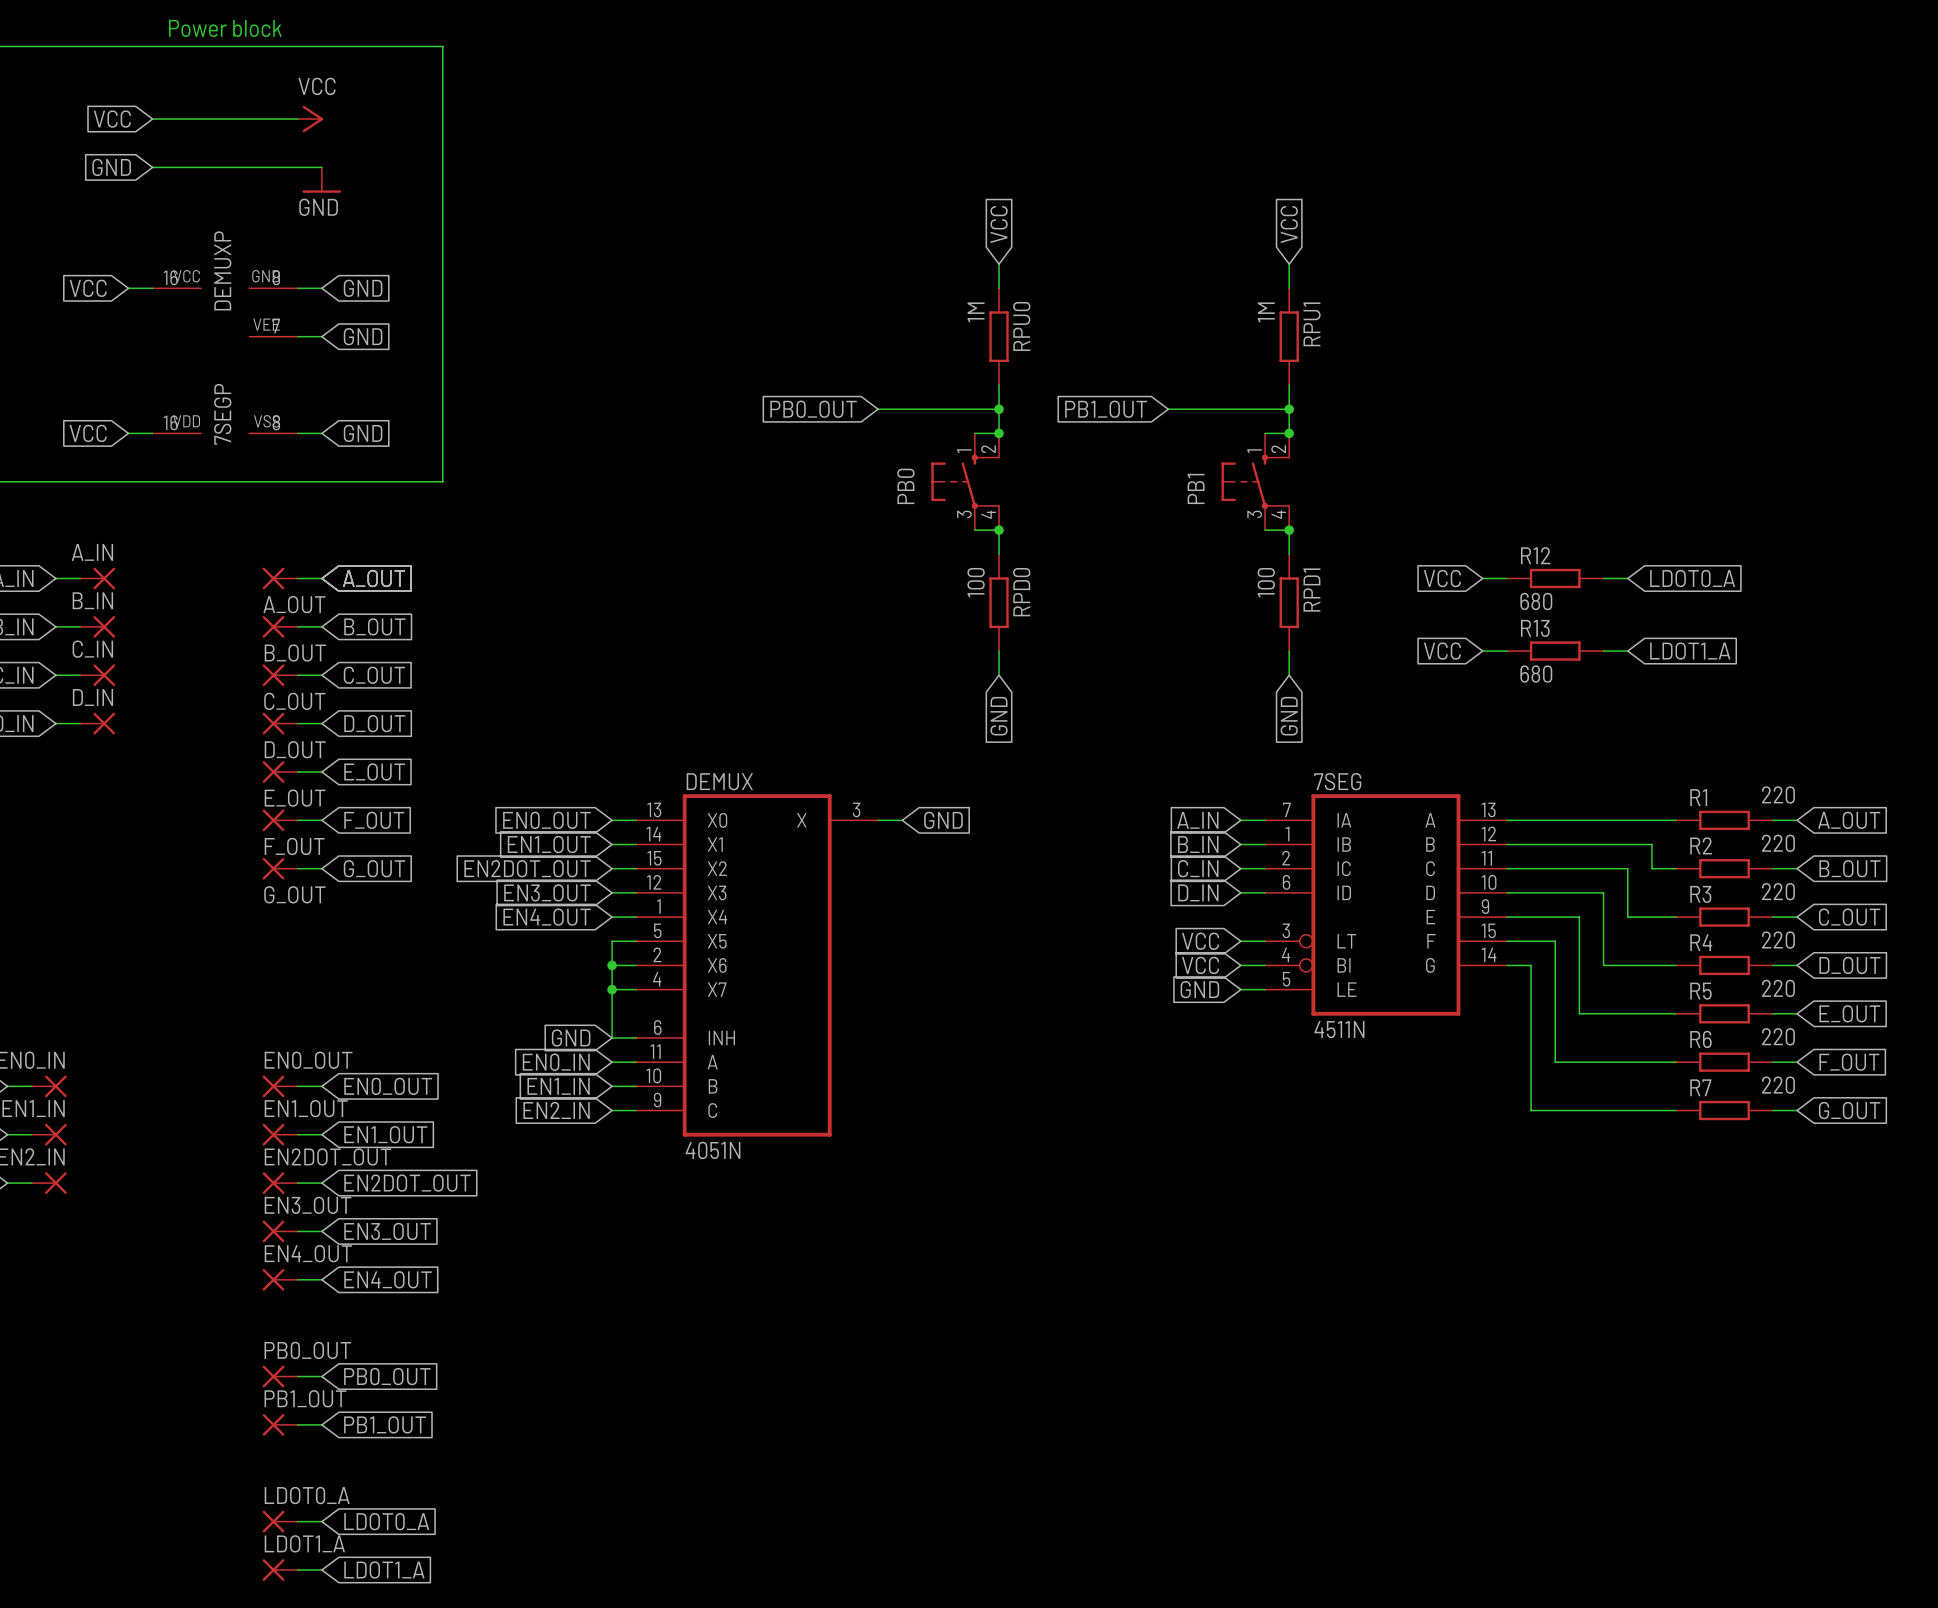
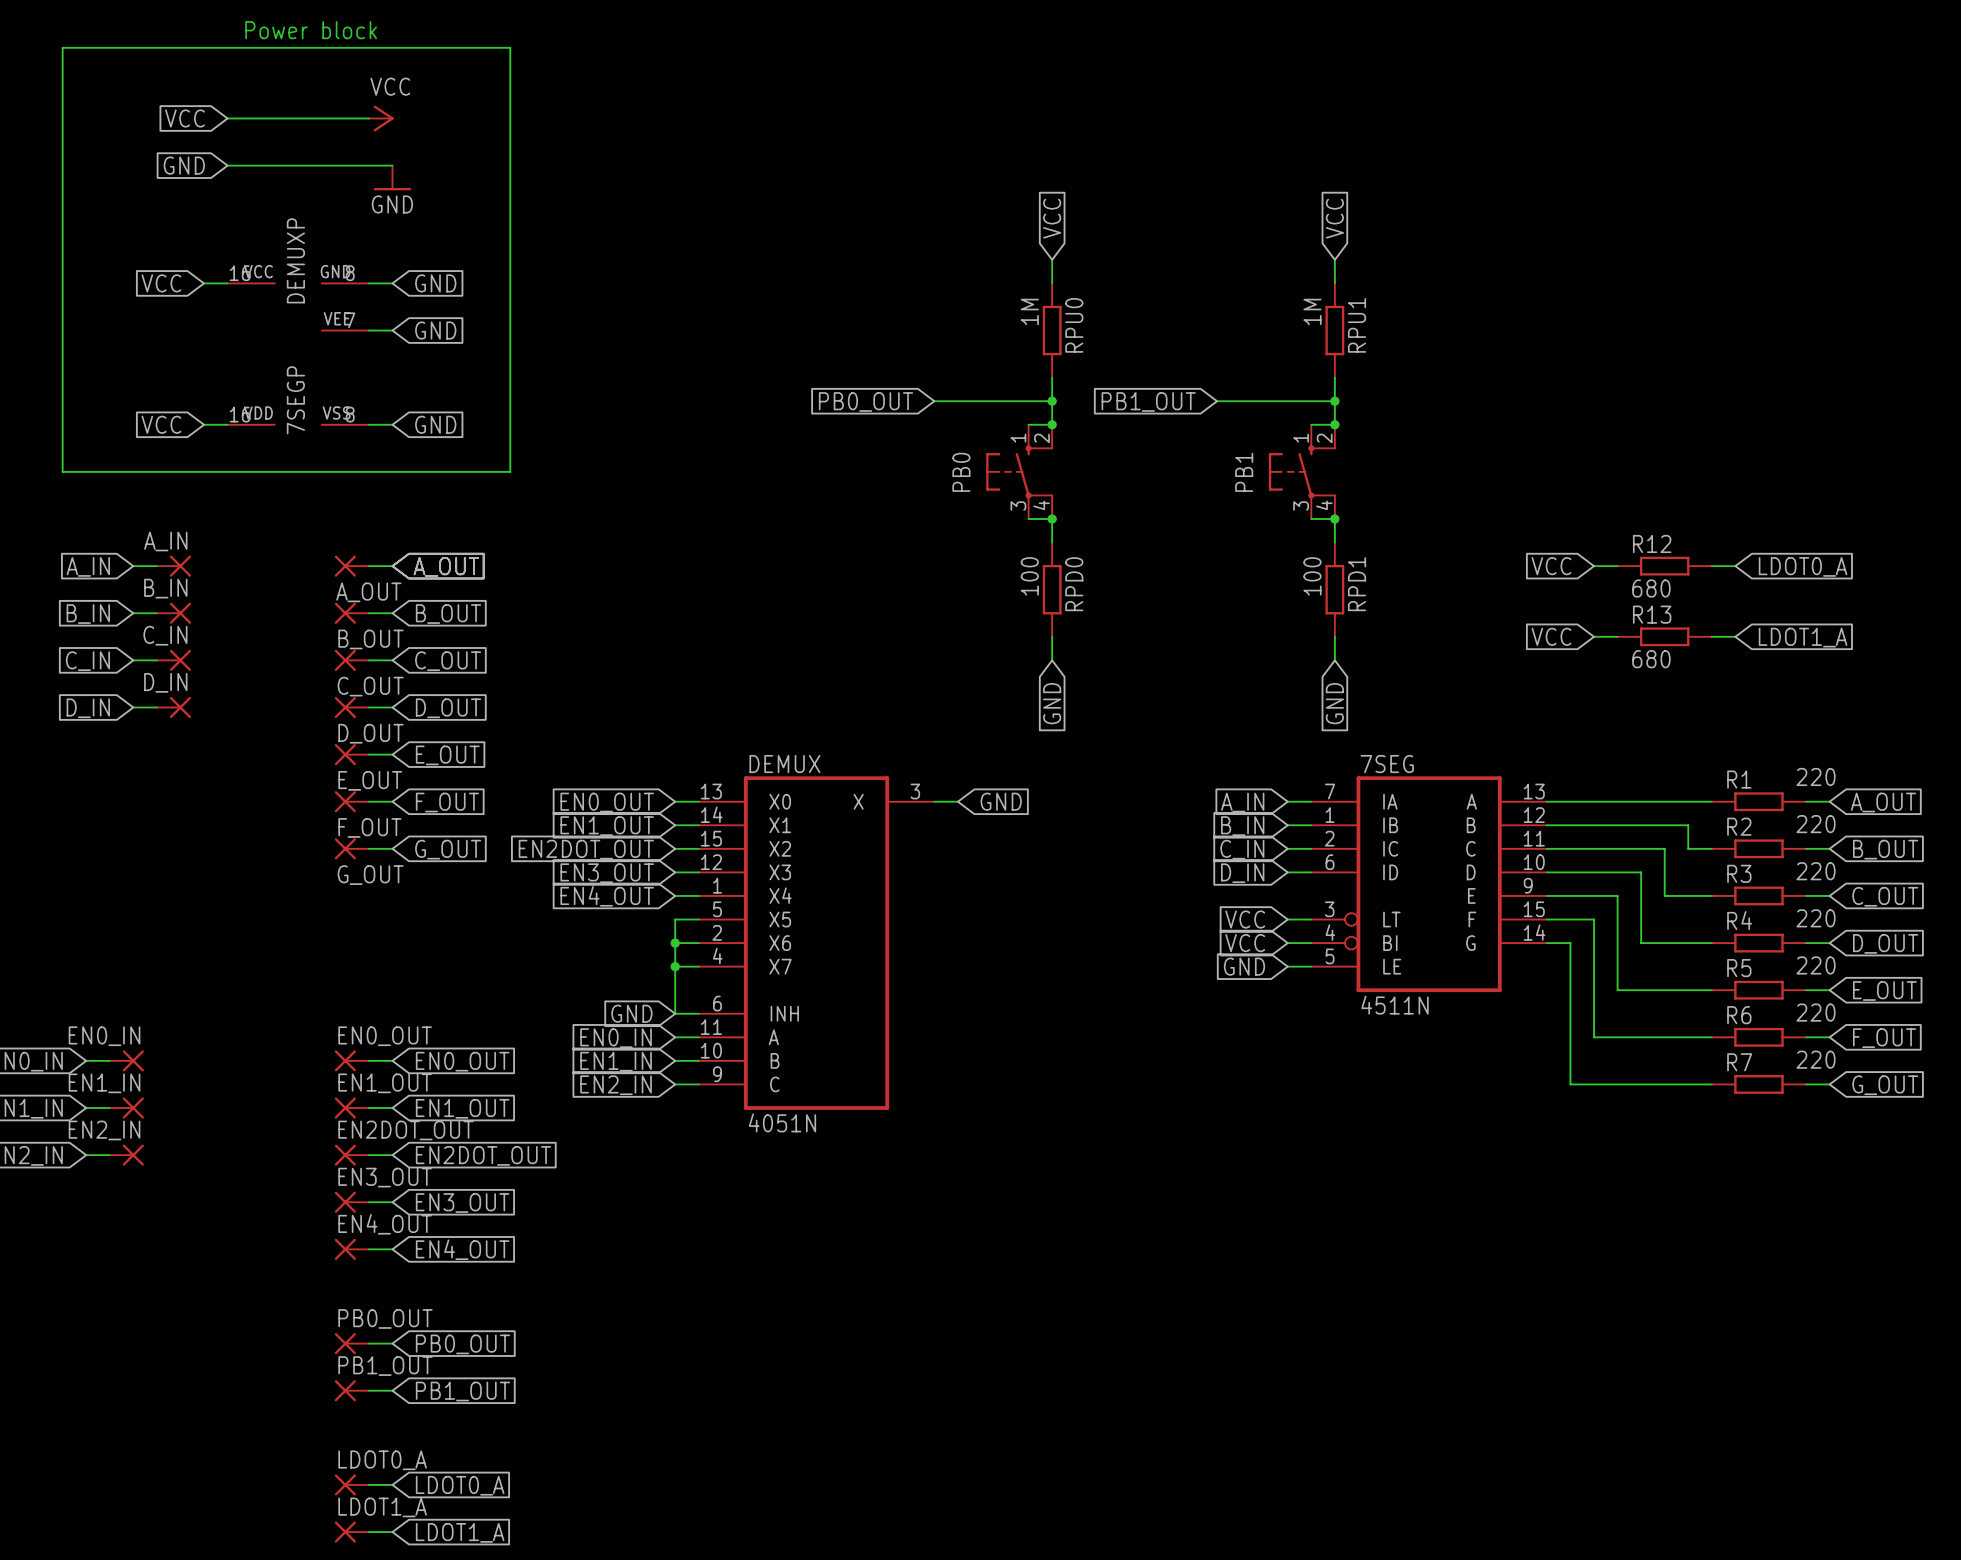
global label position: VCC (1442, 578) -> VCC (1551, 566)
wire: (1482, 578) (1506, 578) -> (1594, 566) (1617, 566)
R12 position: (1555, 578) -> (1664, 566)
wire: (1603, 578) (1627, 578) -> (1711, 566) (1735, 566)
global label position: LDOT0_A (1692, 578) -> LDOT0_A (1803, 566)
global label position: VCC (1442, 651) -> VCC (1551, 636)
wire: (1482, 651) (1506, 651) -> (1594, 636) (1617, 636)
R13 position: (1555, 651) -> (1664, 636)
wire: (1603, 651) (1627, 651) -> (1711, 636) (1735, 636)
global label position: LDOT1_A (1690, 651) -> LDOT1_A (1803, 637)

